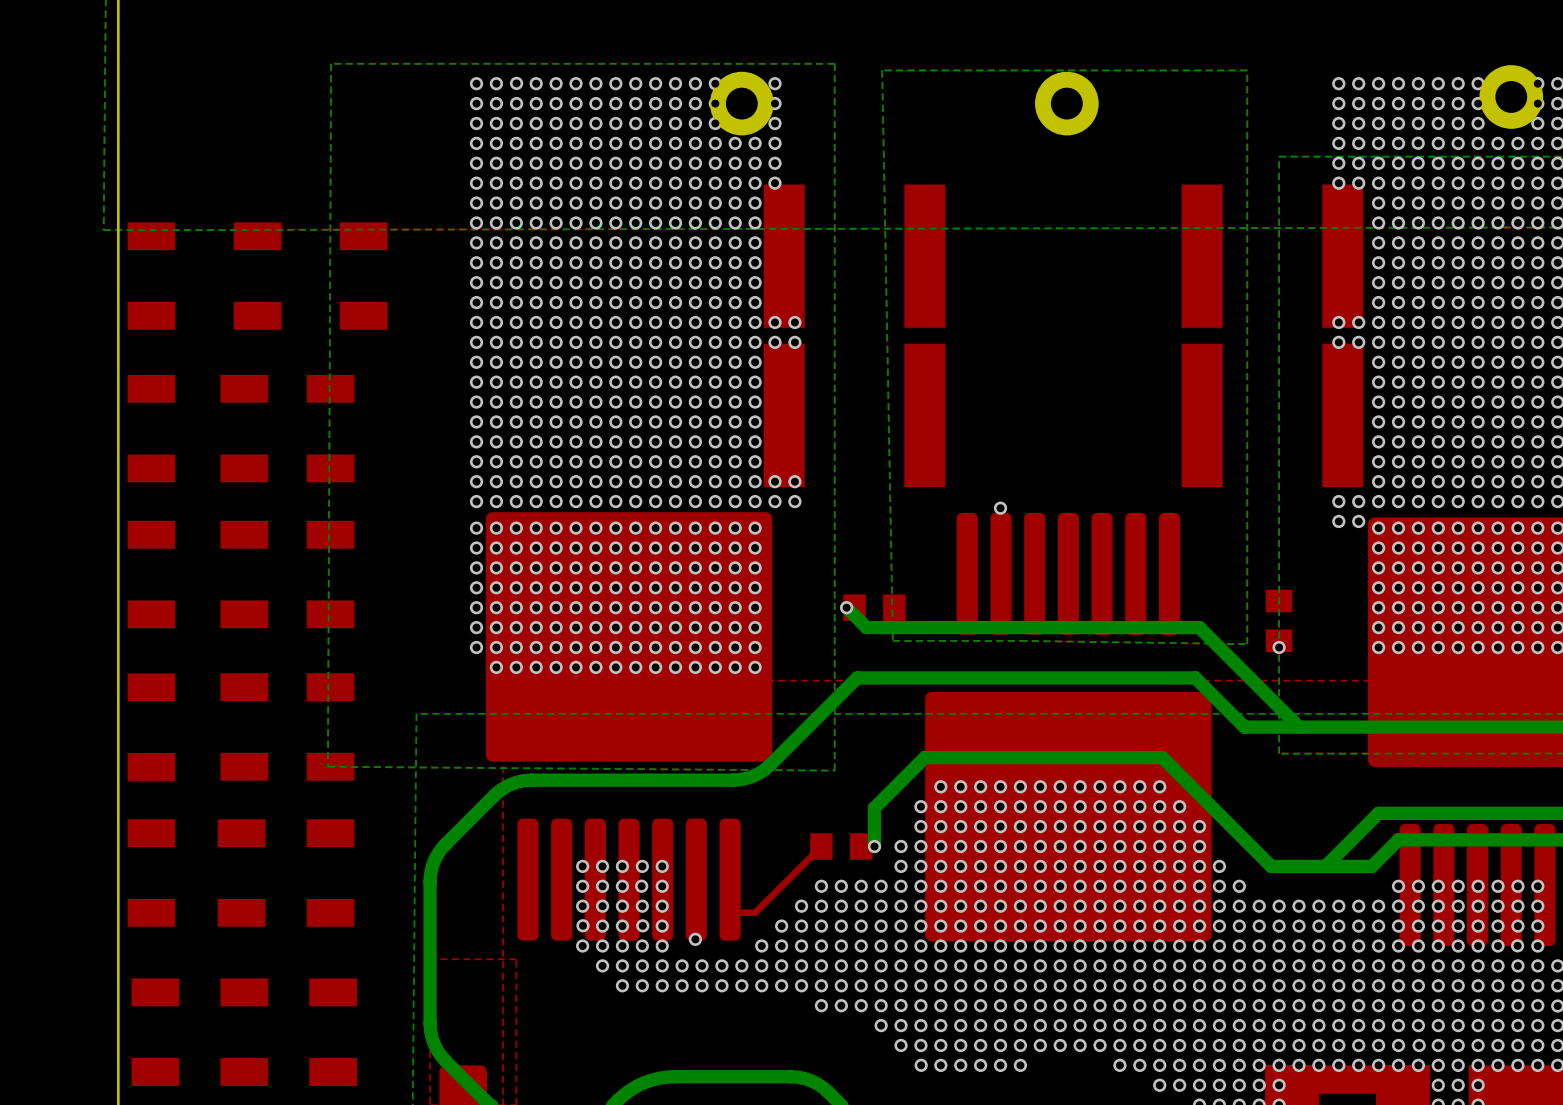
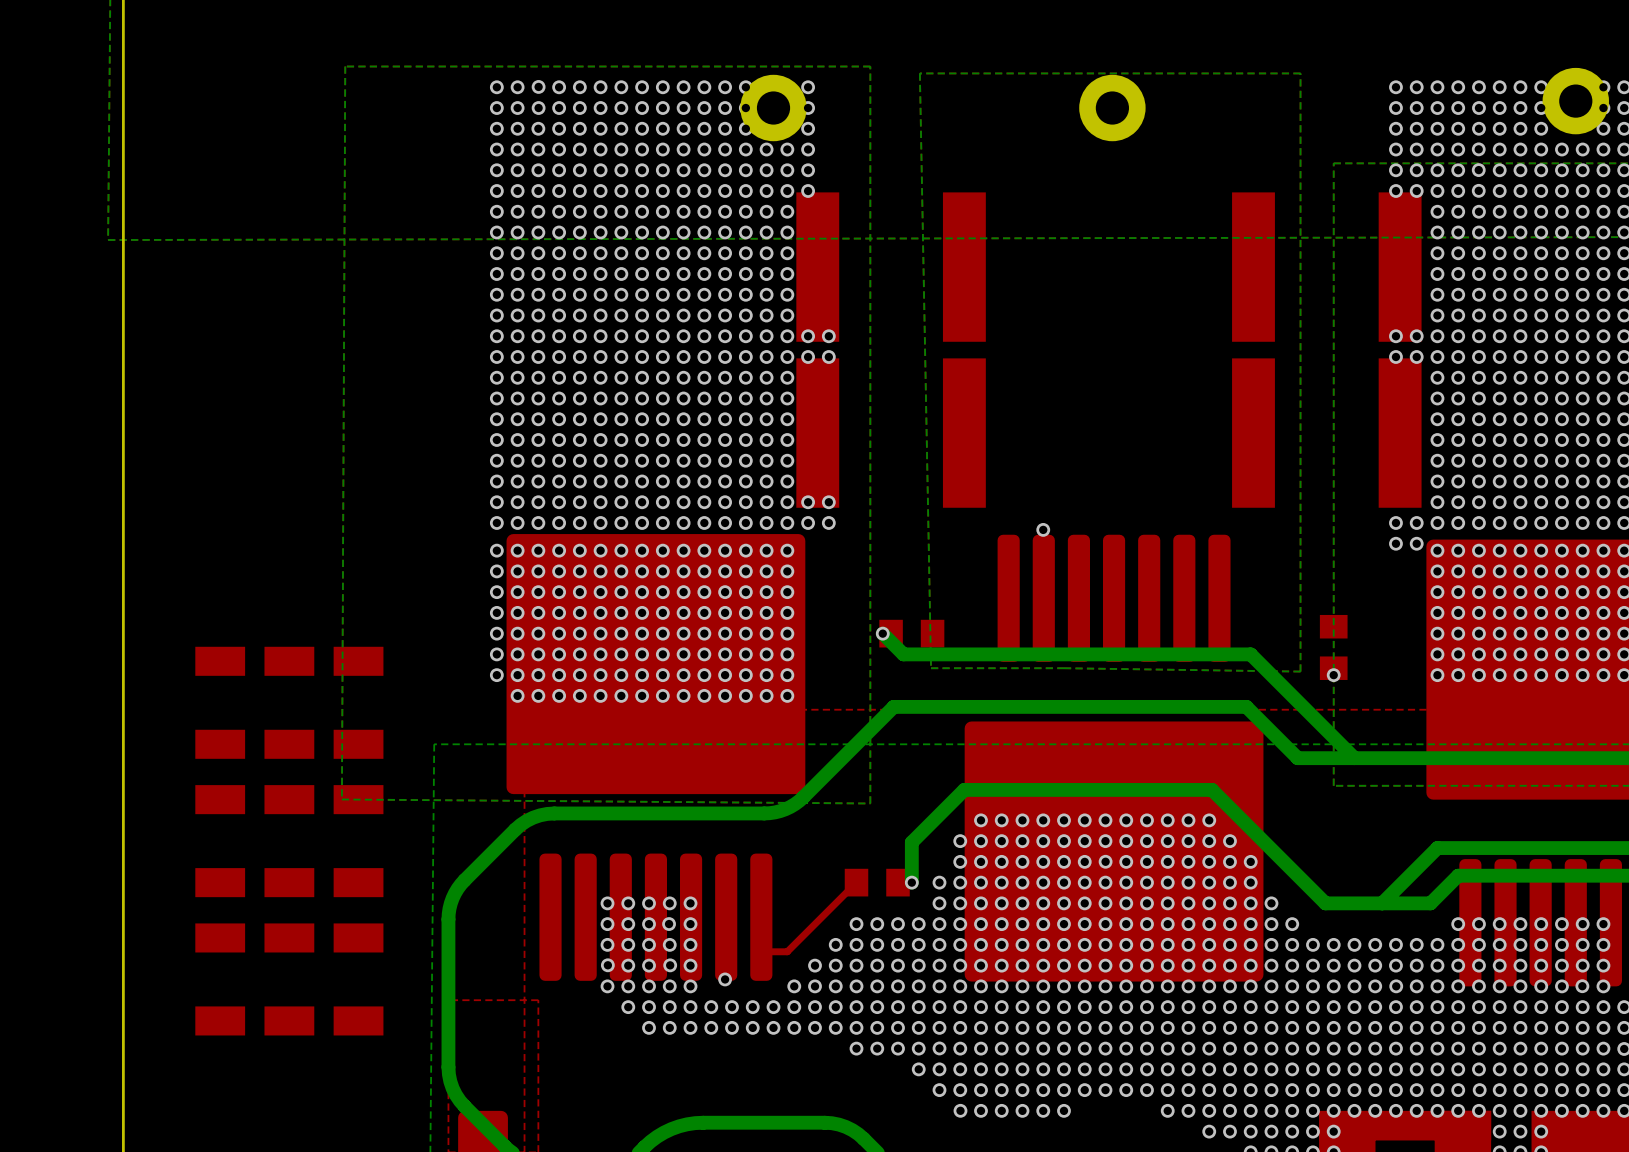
part: (151, 276) -> none
part: (257, 276) -> none
part: (363, 276) -> none
part: (151, 428) -> none
part: (244, 428) -> none
part: (330, 428) -> none
part: (151, 574) -> none
part: (244, 574) -> none
part: (330, 574) -> none
part: none -> (220, 702)
part: none -> (289, 702)
part: none -> (358, 702)
part: (244, 726) -> none
part: (330, 726) -> none
part: (151, 727) -> none
part: none -> (220, 841)
part: none -> (289, 841)
part: none -> (358, 841)
part: (151, 873) -> none
part: (241, 873) -> none
part: (330, 873) -> none
part: none -> (220, 979)
part: none -> (289, 979)
part: none -> (358, 979)
part: (155, 1032) -> none
part: (244, 1032) -> none
part: (333, 1032) -> none

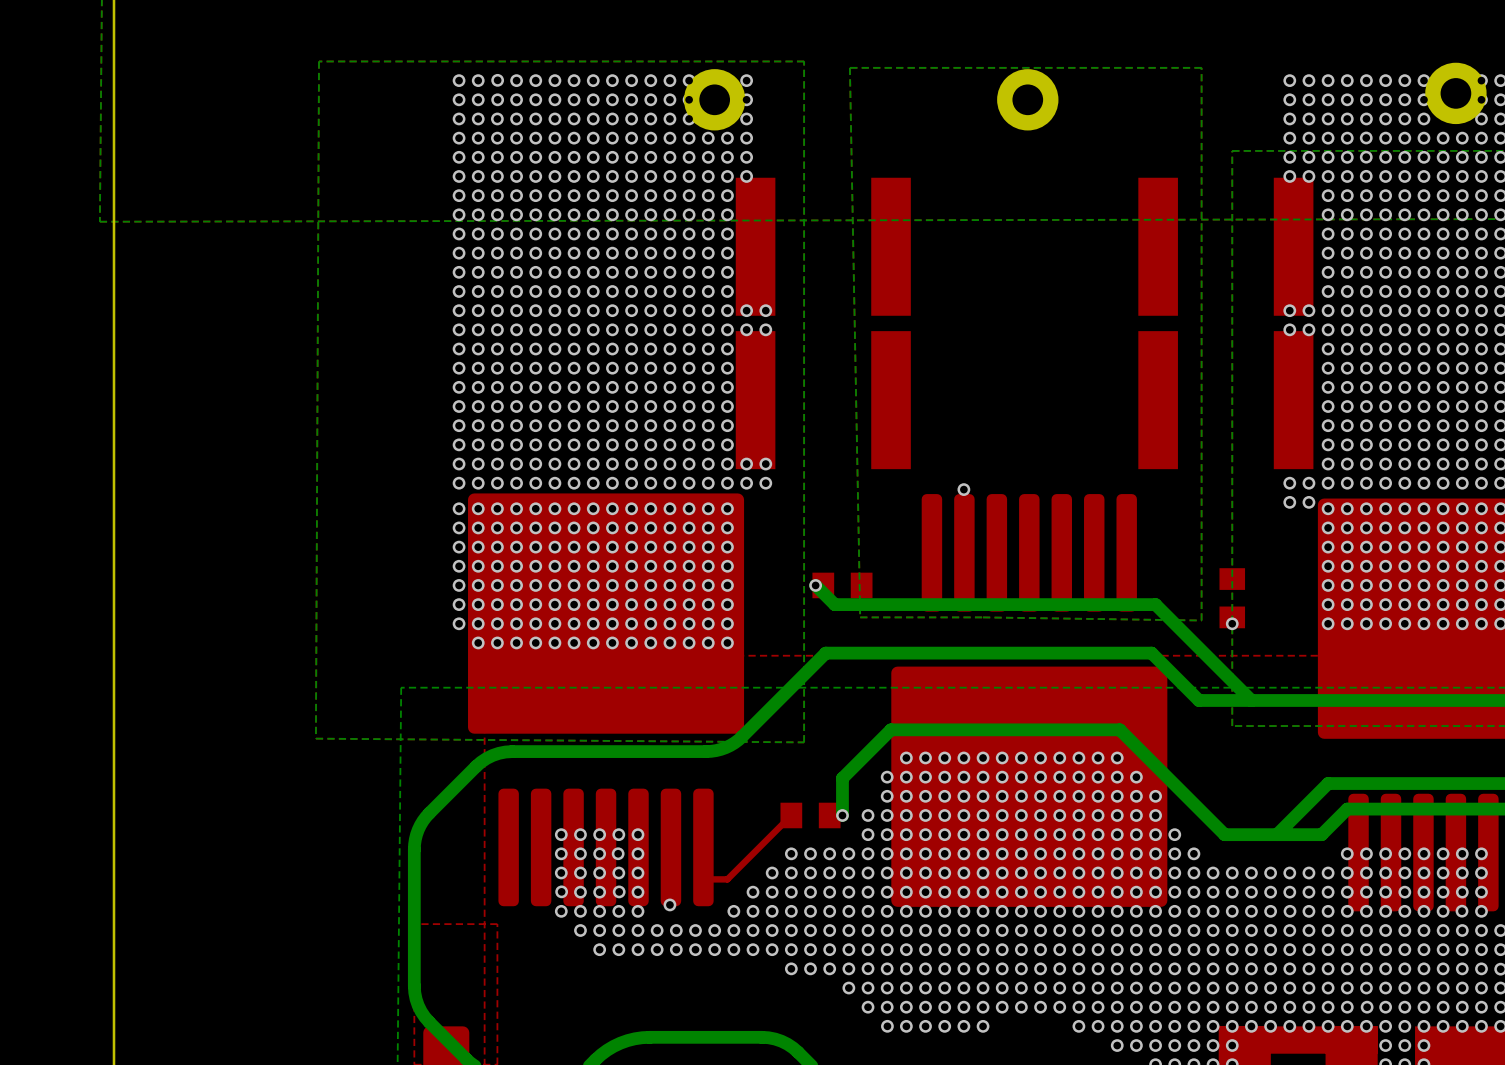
part: (220, 702) -> none
part: (289, 702) -> none
part: (358, 702) -> none
part: (220, 841) -> none
part: (289, 841) -> none
part: (358, 841) -> none
part: (220, 979) -> none
part: (289, 979) -> none
part: (358, 979) -> none

